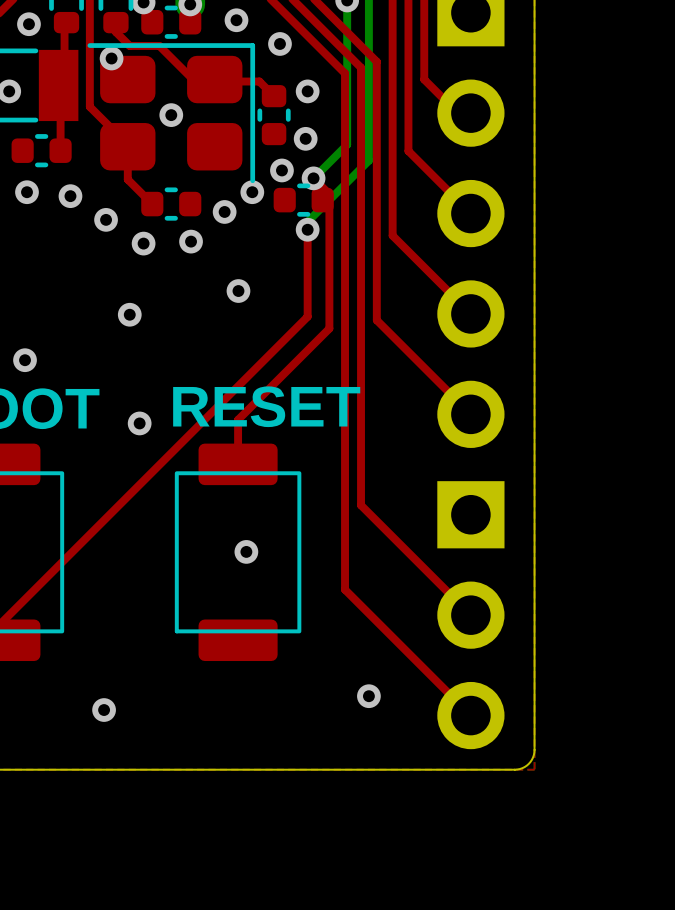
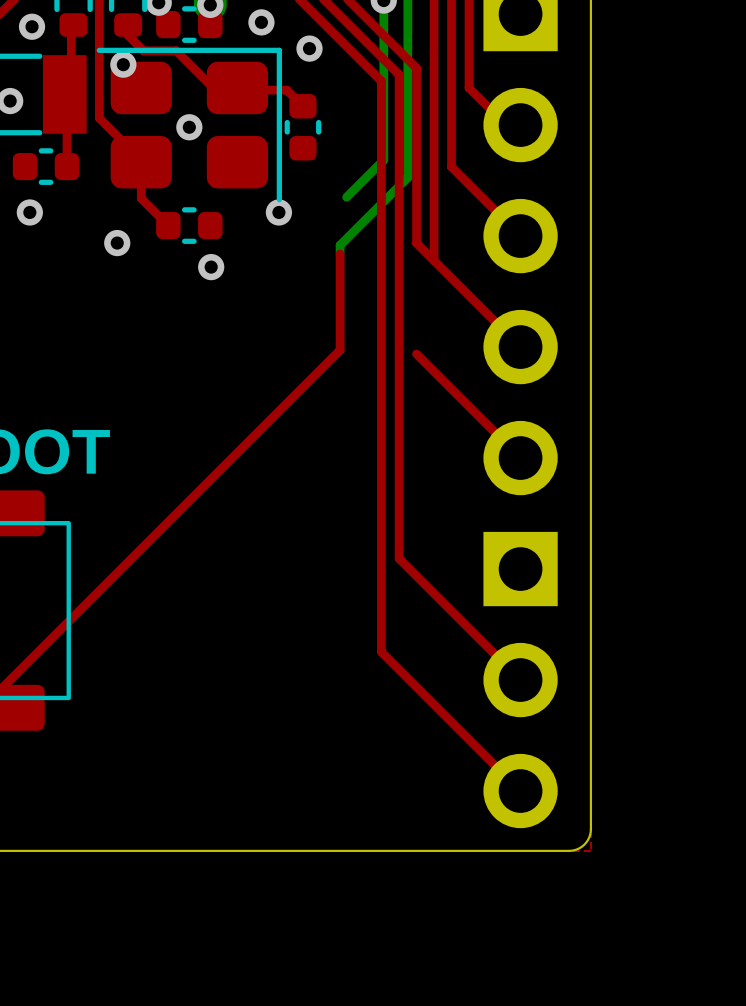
via: (307, 91) -> none
via: (305, 138) -> none
via: (281, 170) -> none
top track: (313, 178) (329, 194) (329, 328) (238, 419) (238, 464) -> none
via: (313, 178) -> none
via: (70, 196) -> none
part: (303, 200) -> none
via: (224, 211) -> none
top track: (376, 219) (376, 320) -> (416, 243) (434, 260)
via: (307, 229) -> none
via: (143, 243) -> none
via: (238, 291) -> none
via: (129, 314) -> none
via: (25, 360) -> none
text: RESET (266, 406) -> none
via: (139, 423) -> none
via: (246, 551) -> none
part: (238, 552) -> none
via: (368, 696) -> none
via: (104, 710) -> none

